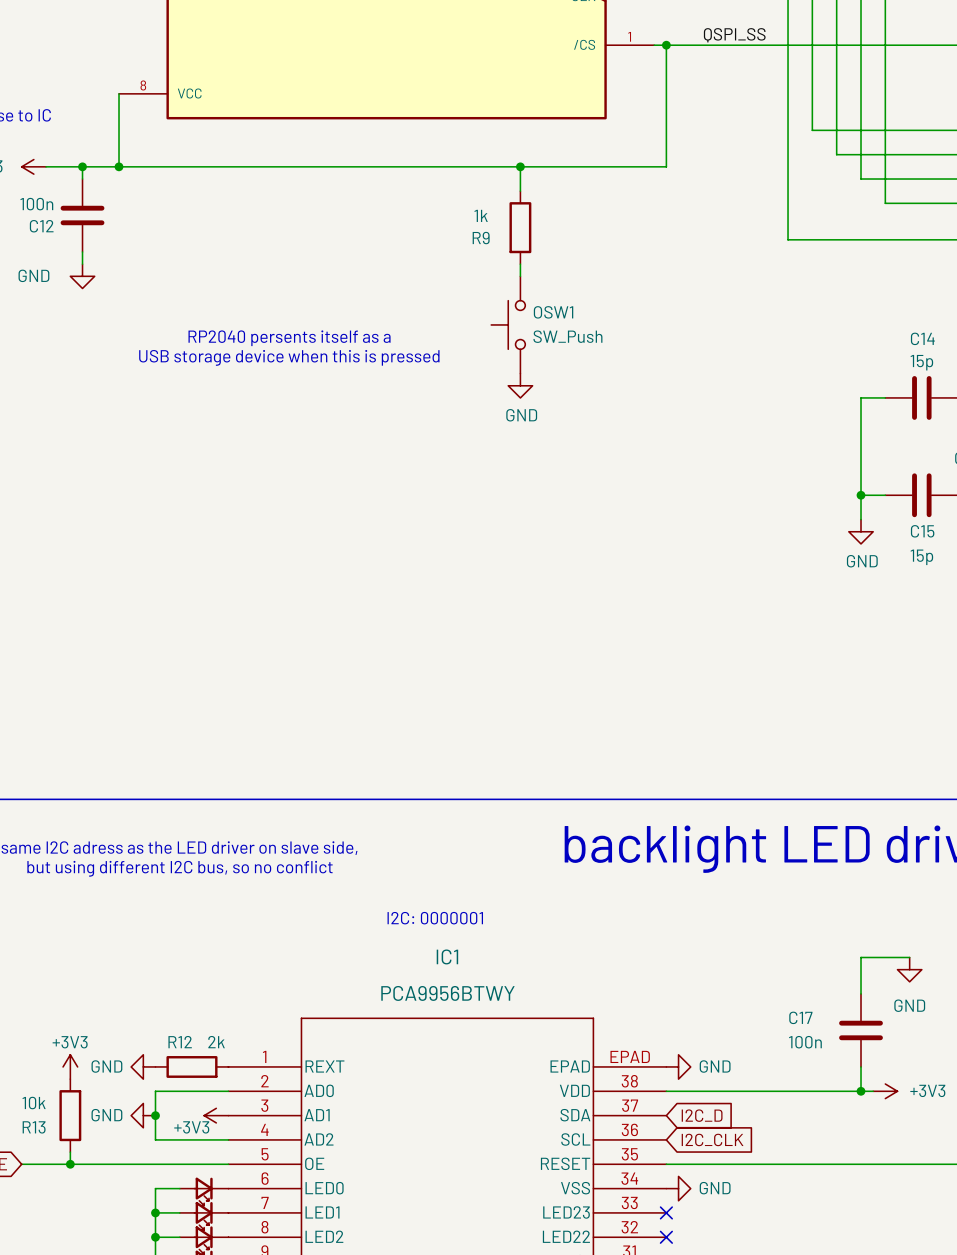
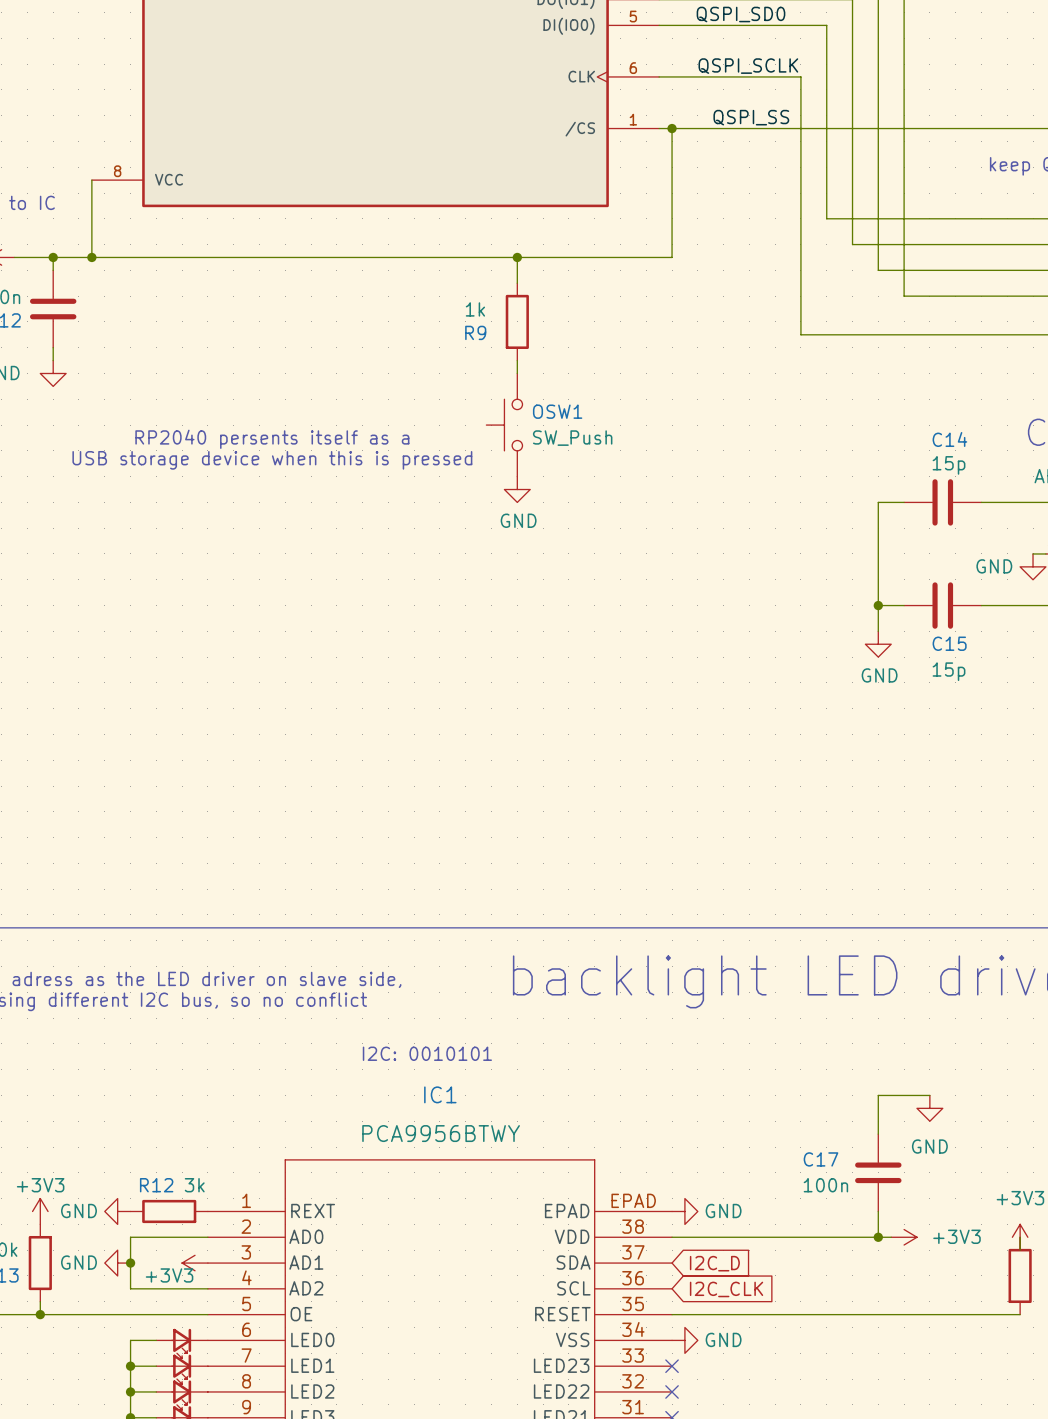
text: I2C: 0000001 (435, 918) -> I2C: 0010101 (427, 1053)
R12 value: 2k (216, 1042) -> 3k (194, 1185)

